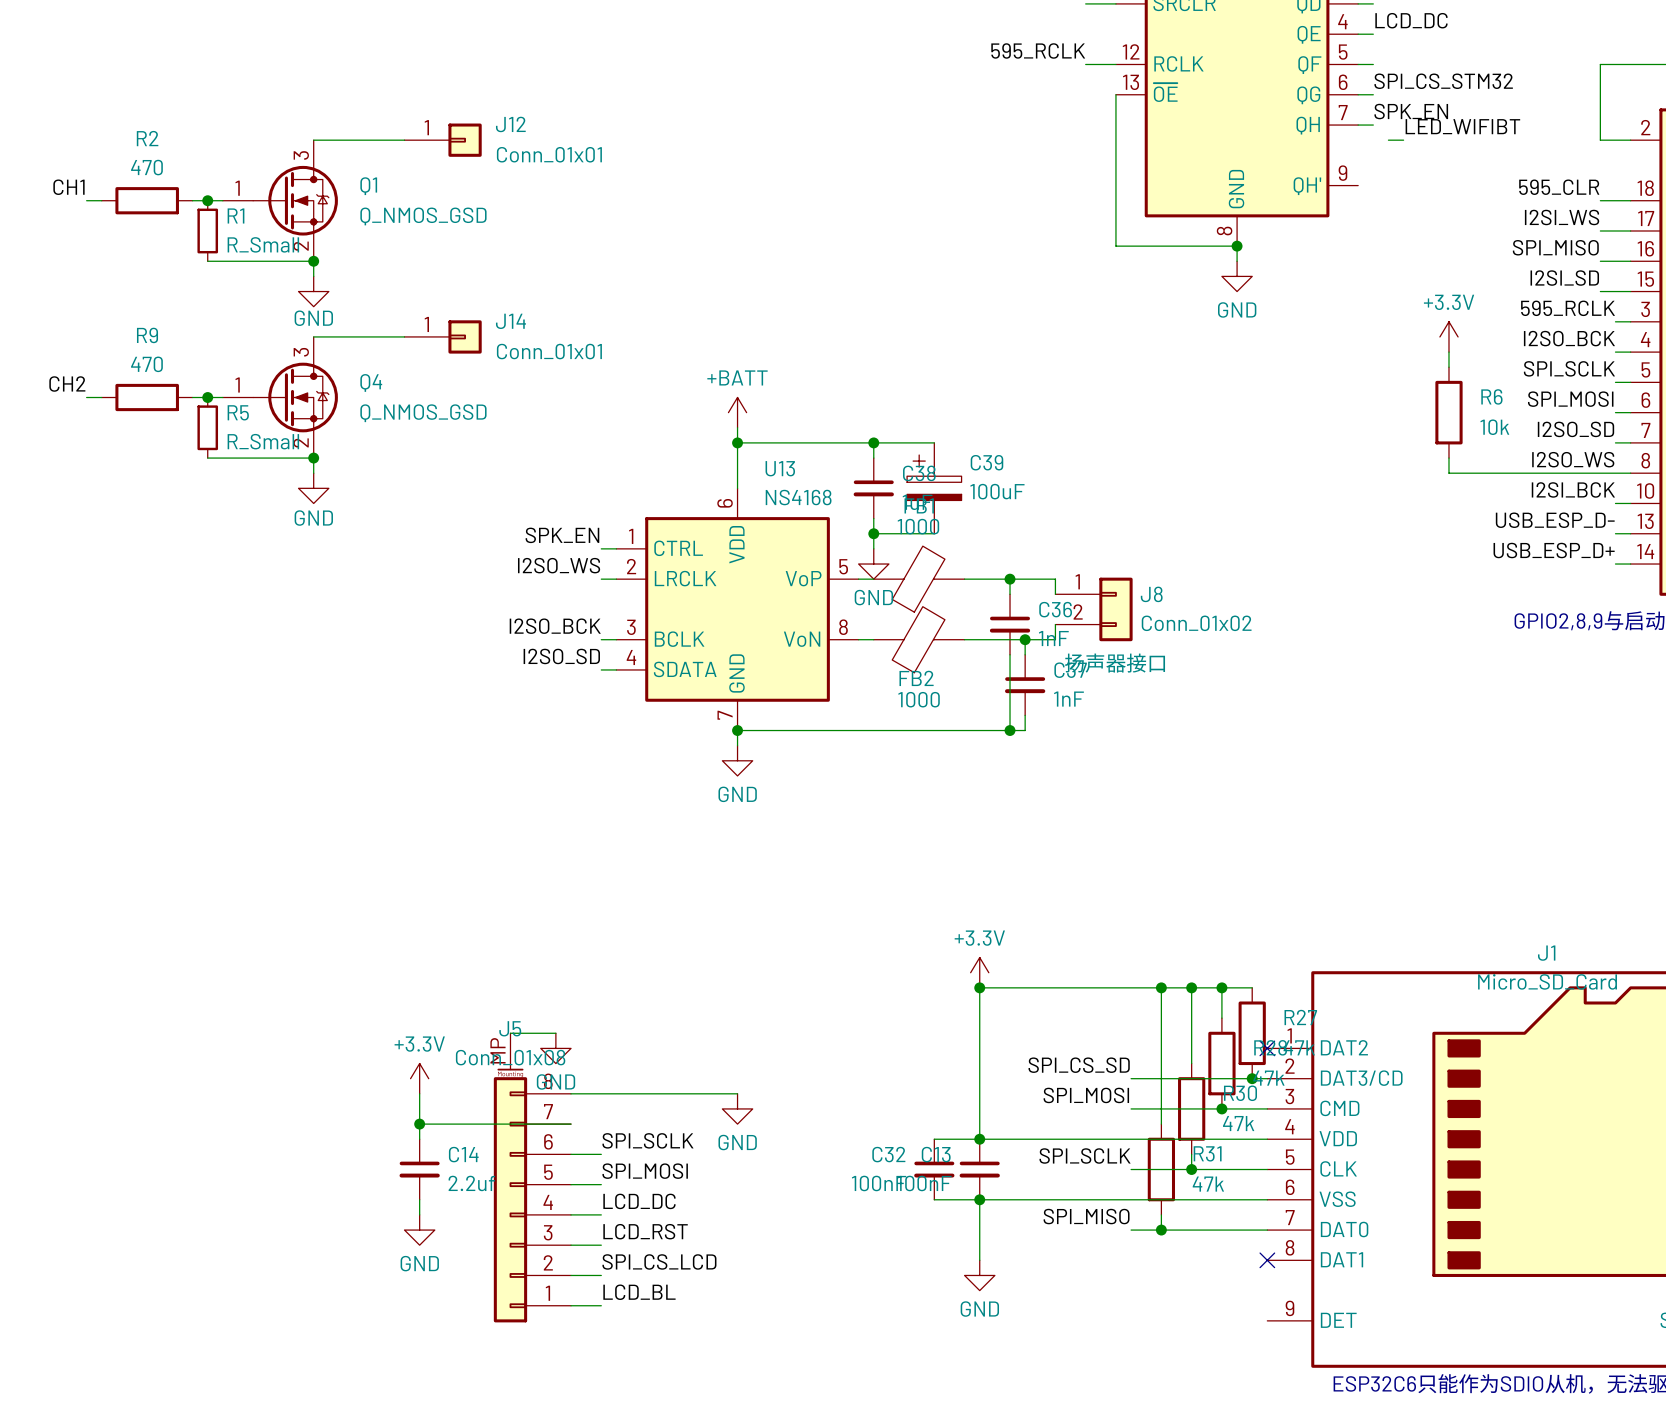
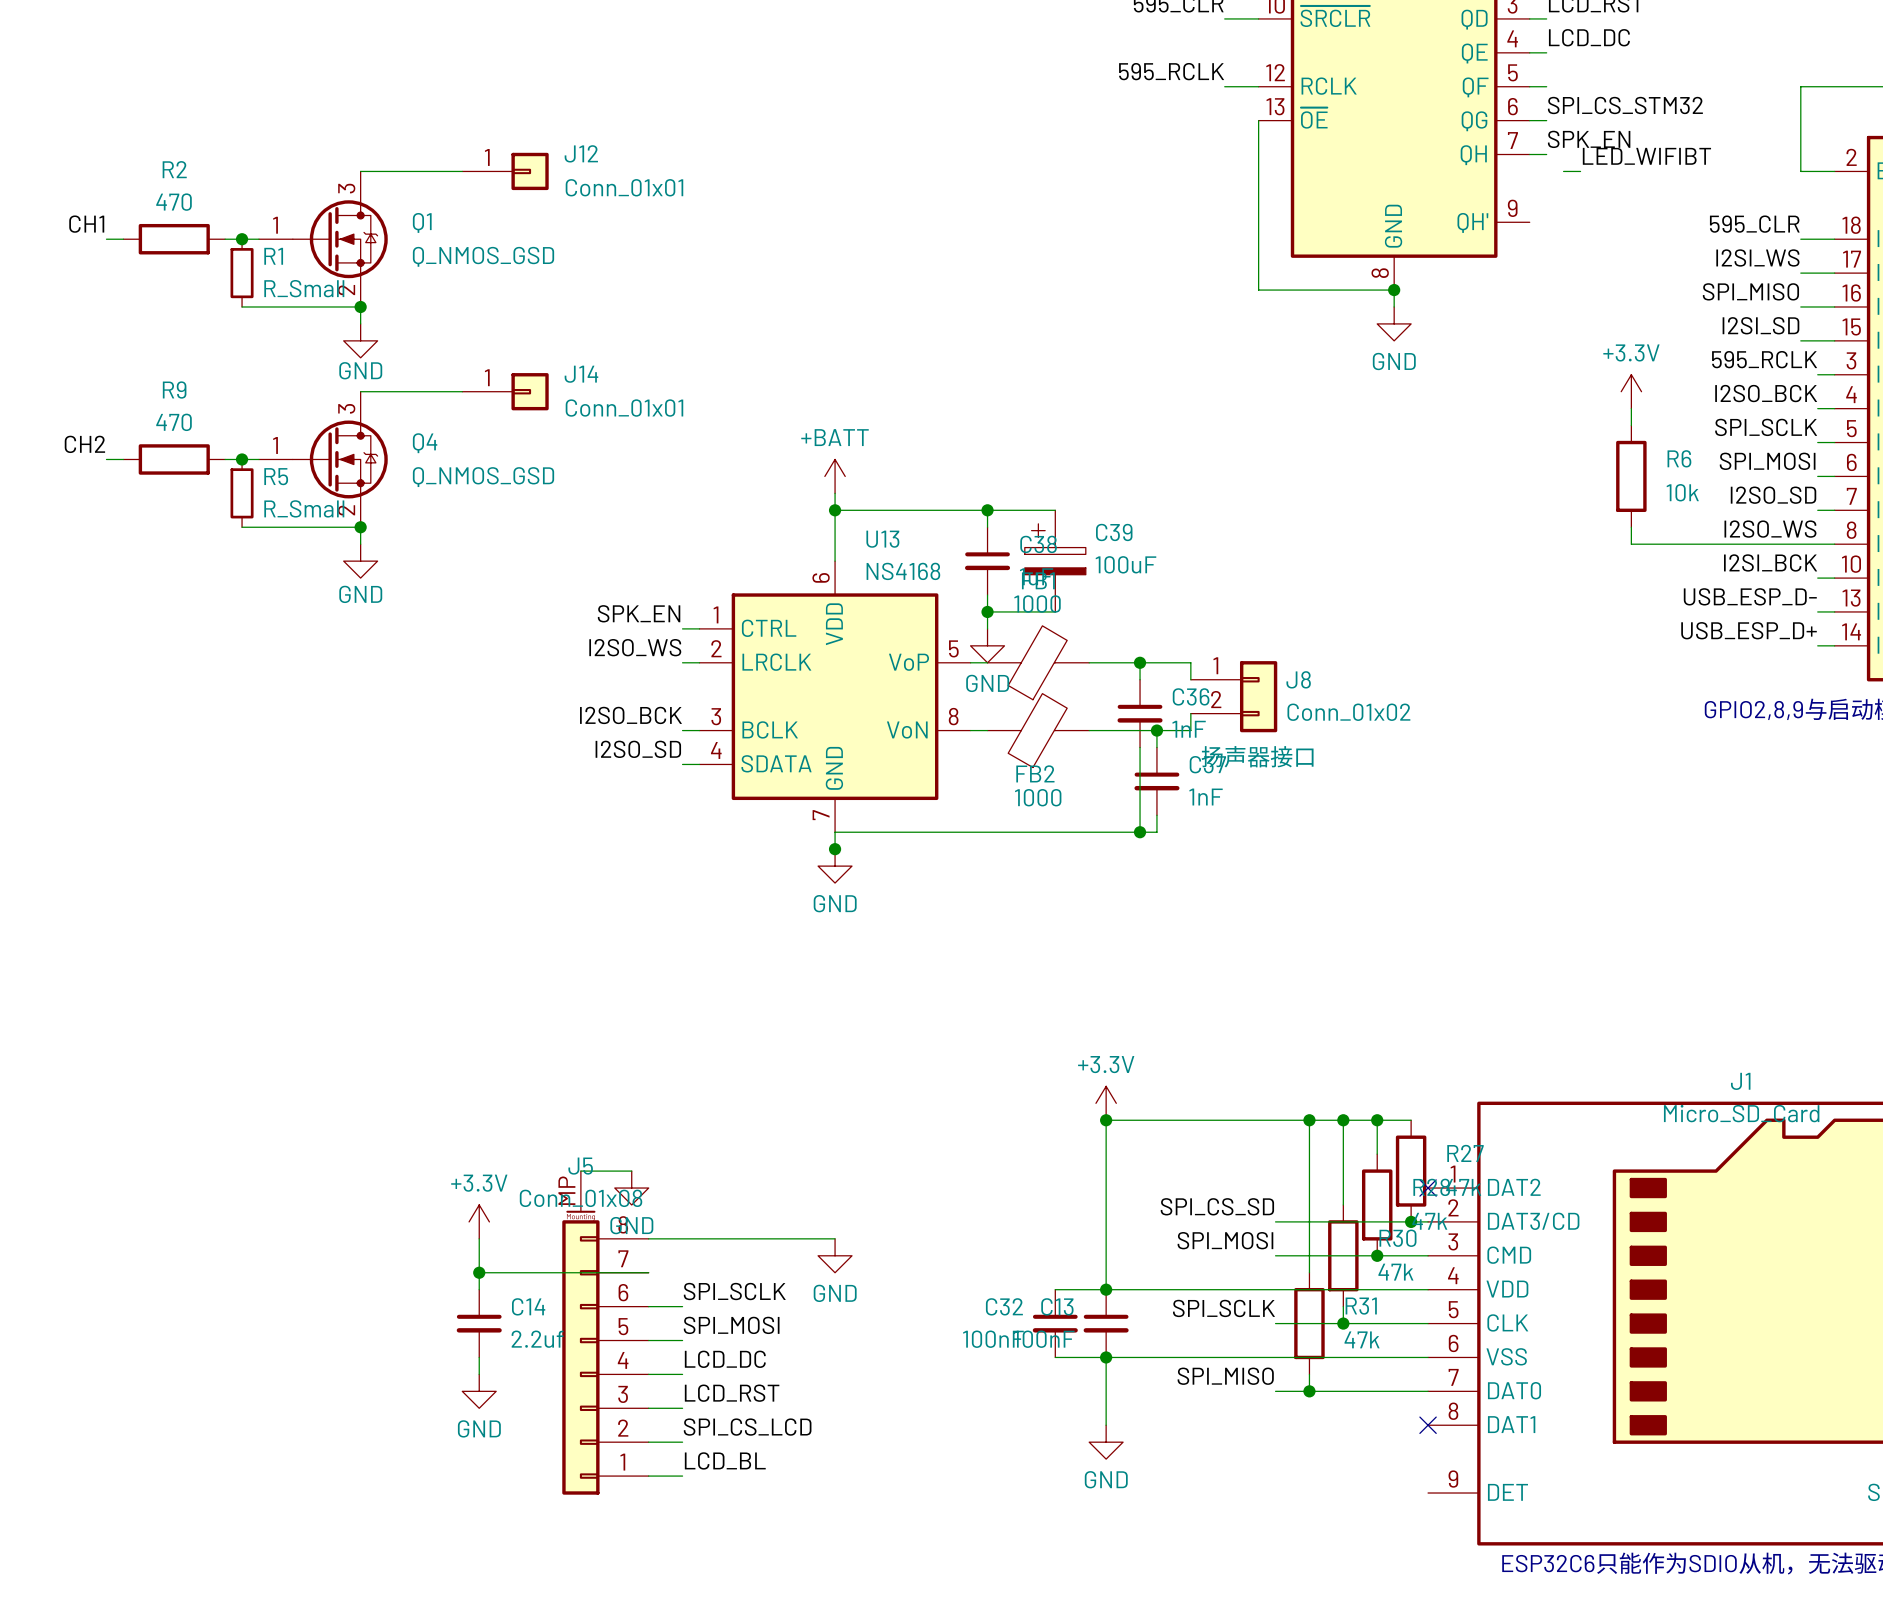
junction position: (737, 730) -> (835, 849)

